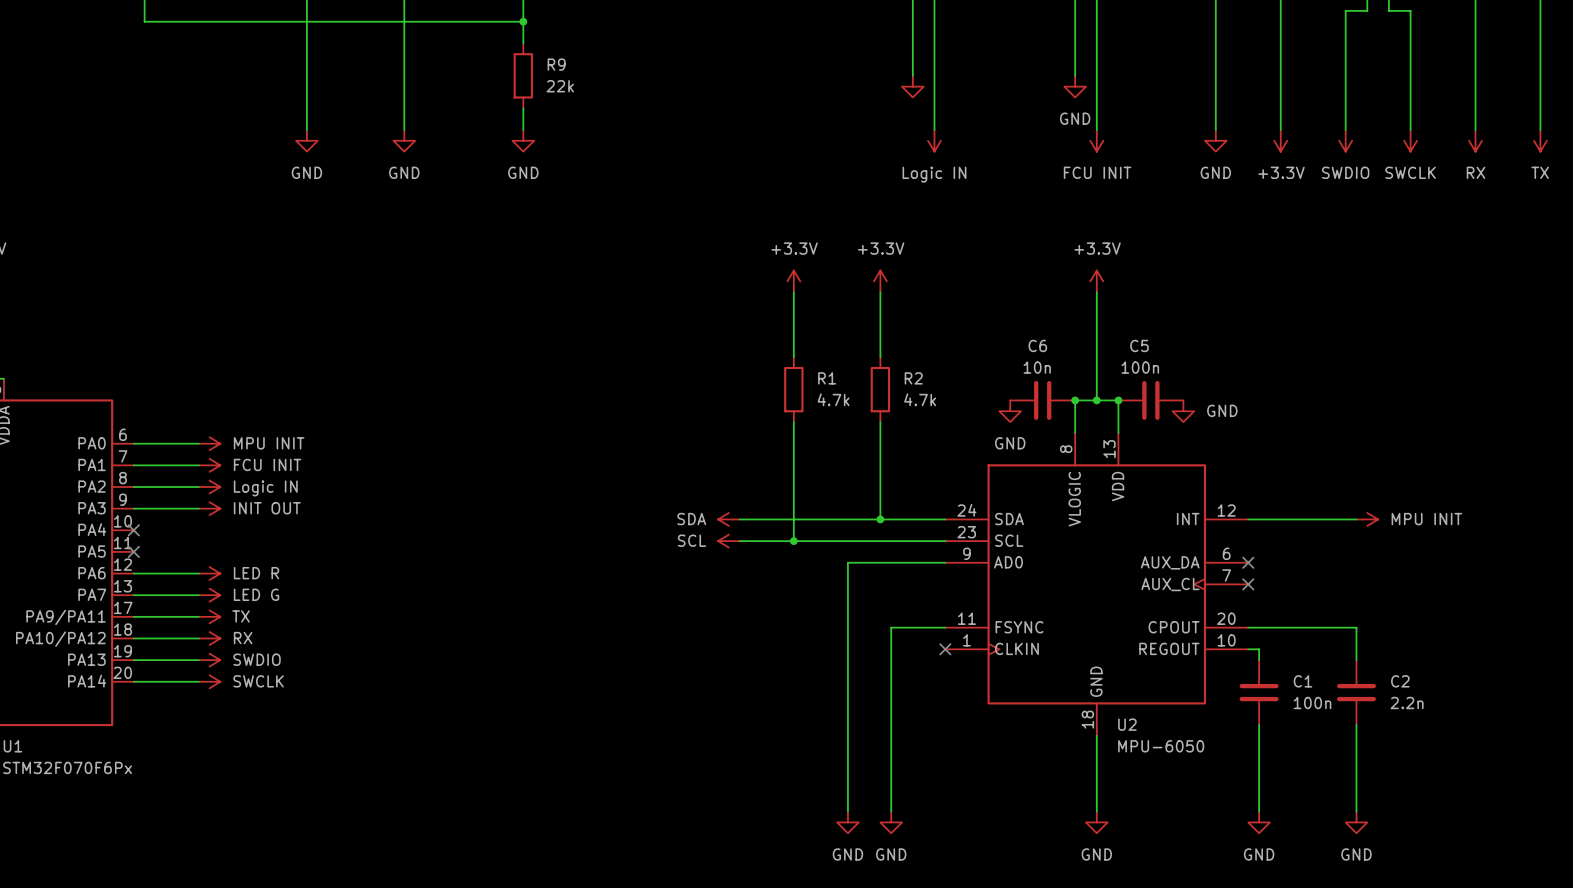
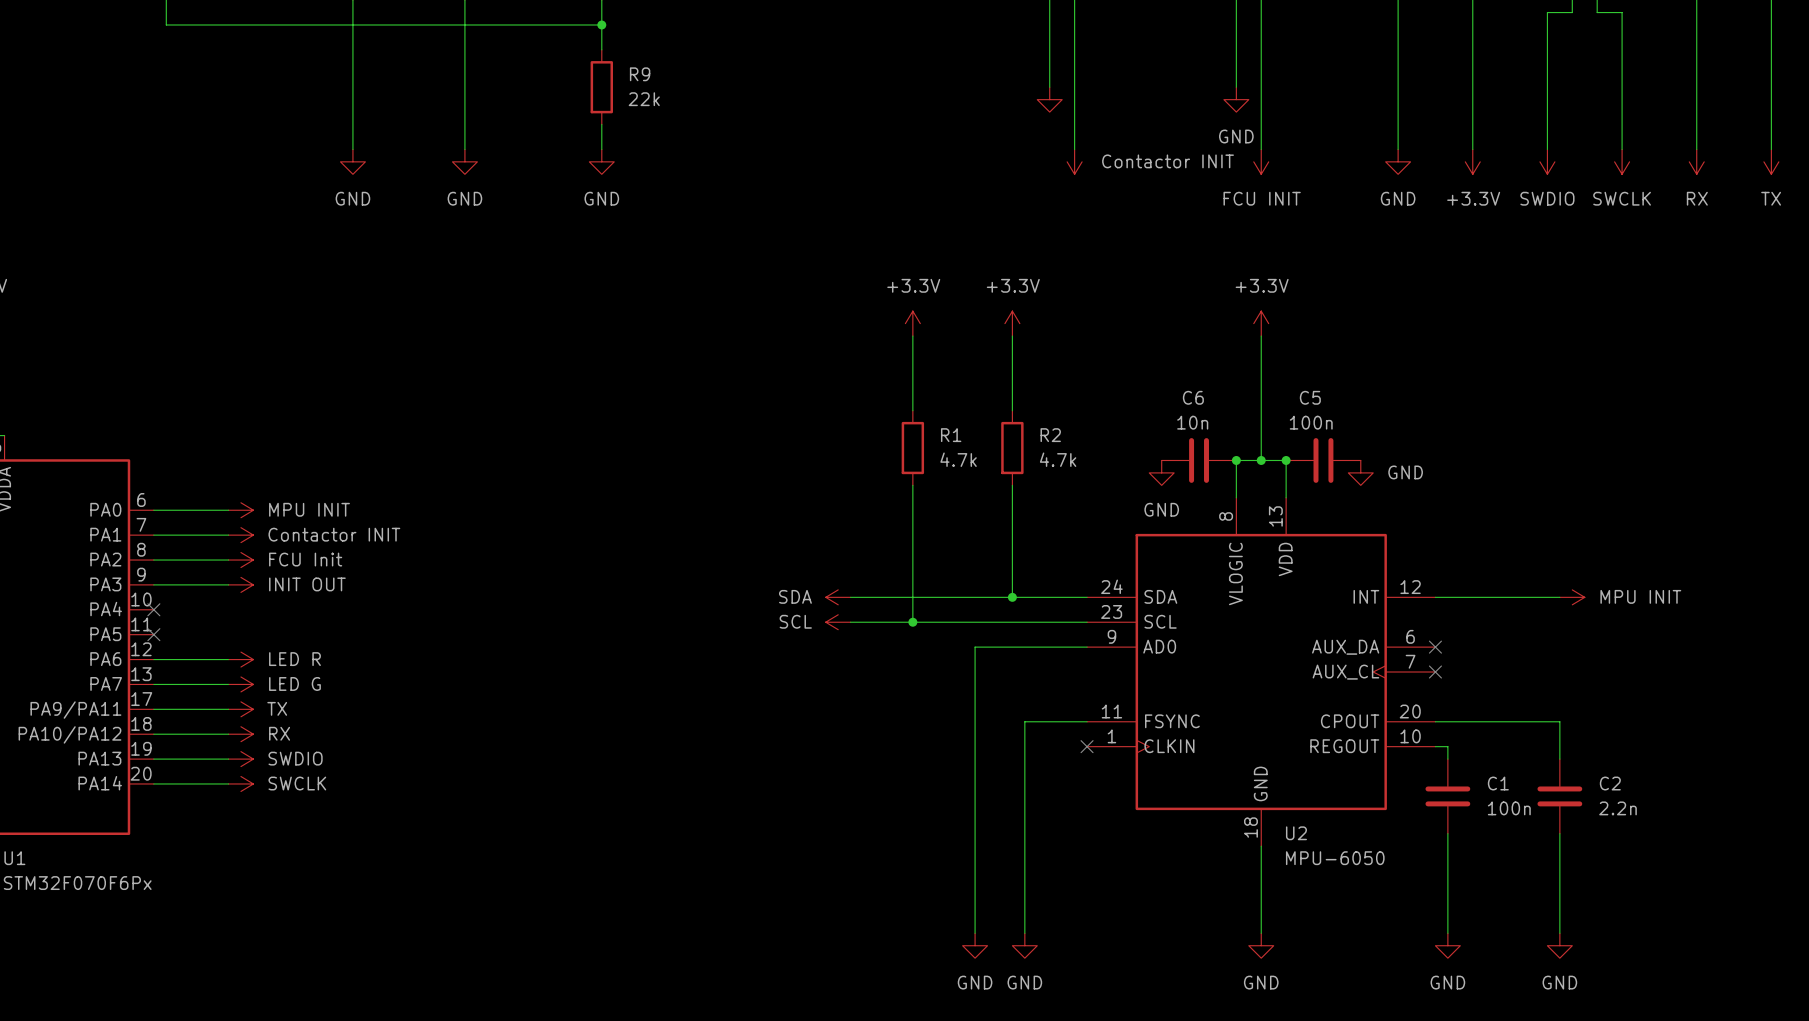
power symbol: Logic IN (934, 140) -> Contactor INIT (1074, 161)
power symbol: FCU INIT (209, 465) -> Contactor INIT (240, 535)
power symbol: Logic IN (209, 487) -> FCU Init (240, 560)

